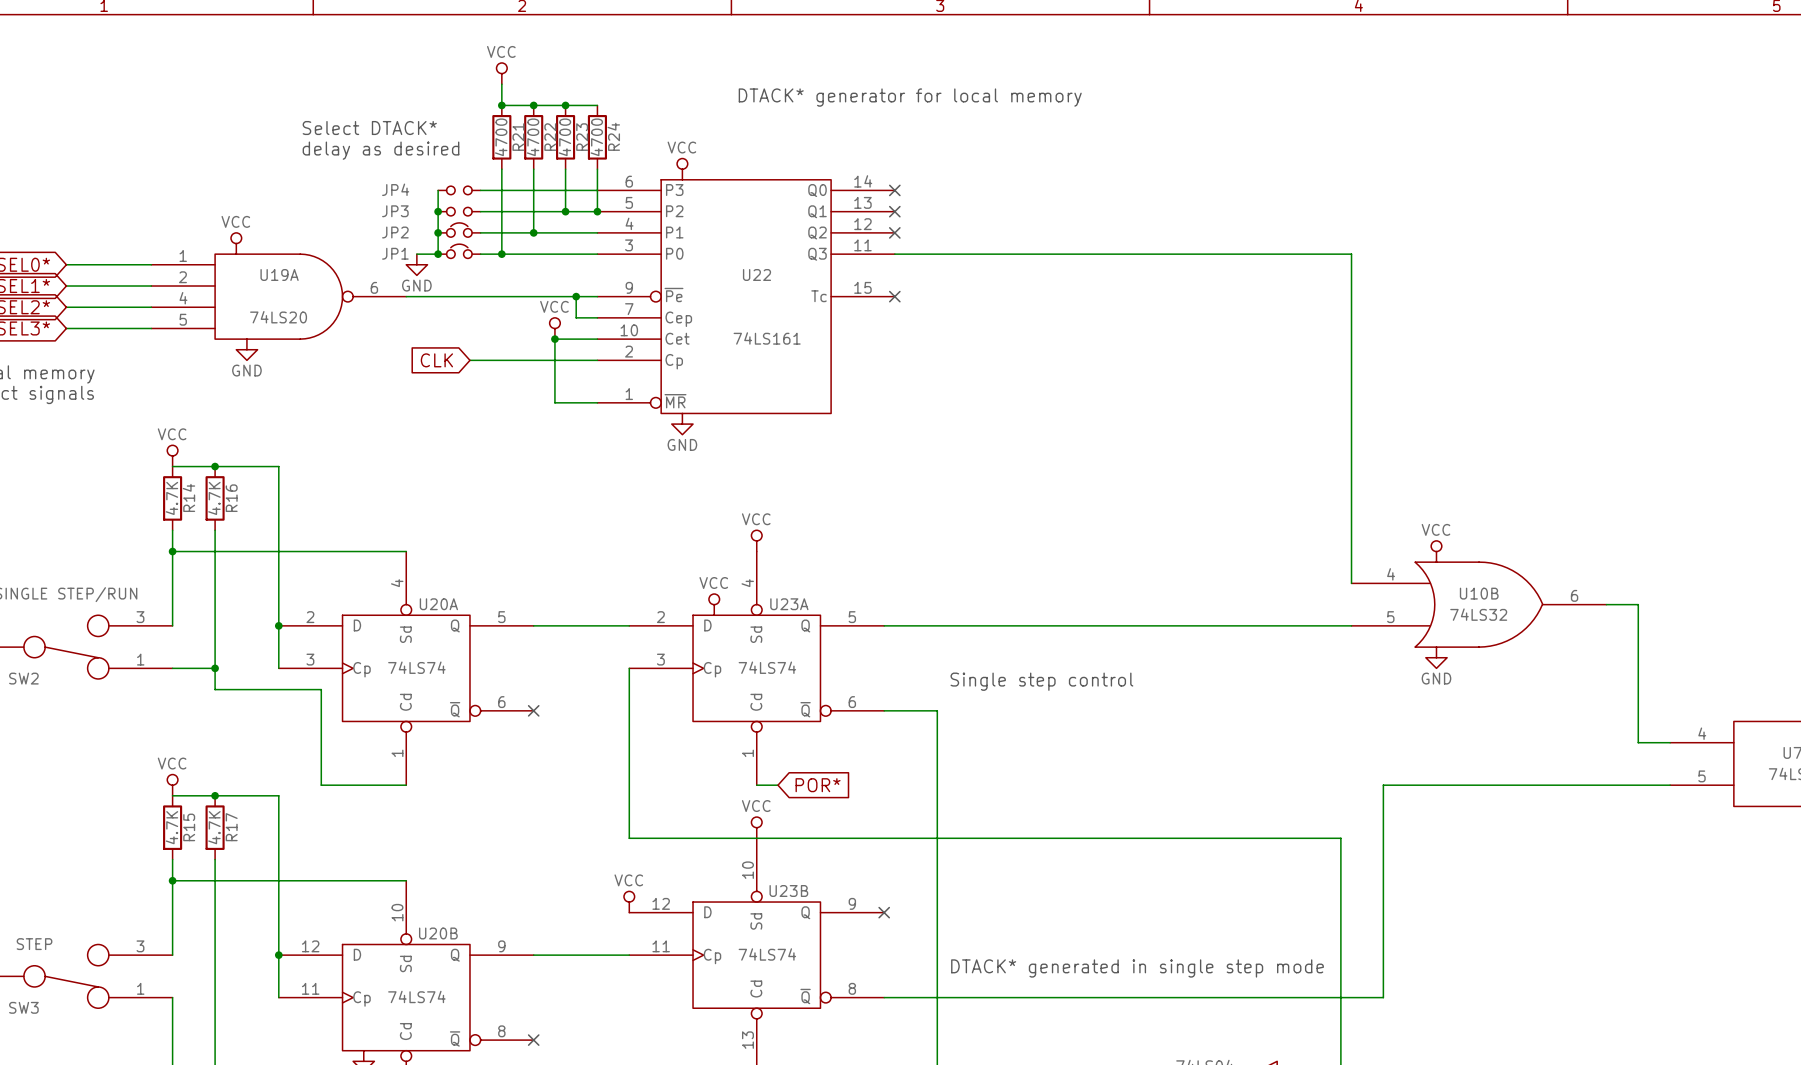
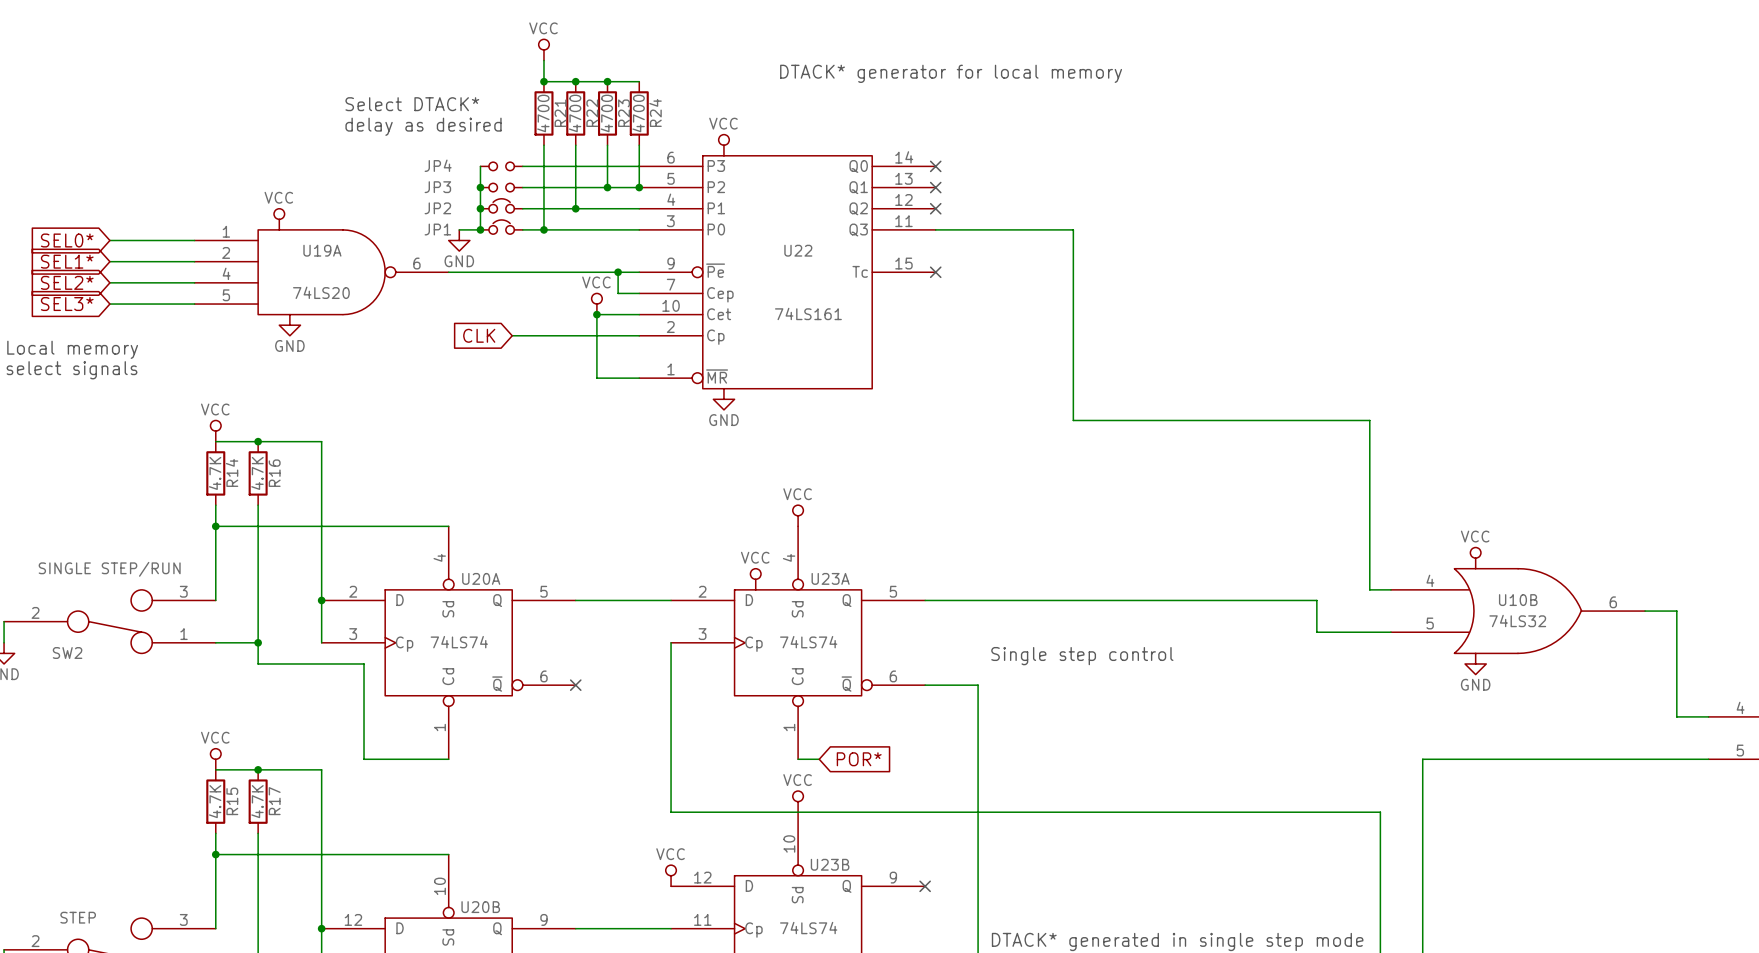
wire: (1032, 254) (1351, 254) (1351, 583) -> (1073, 229) (1073, 420) (1369, 420) (1369, 589) (1390, 589)
power symbol position: VCC (1436, 551) -> VCC (1475, 558)
U10B position: (1478, 604) -> (1518, 611)
wire: (1606, 604) (1638, 604) (1638, 636) -> (1645, 611) (1676, 611)
wire: (1277, 625) (1351, 625) -> (1316, 600) (1316, 632) (1390, 632)
power symbol position: GND (1436, 657) -> GND (1475, 663)

